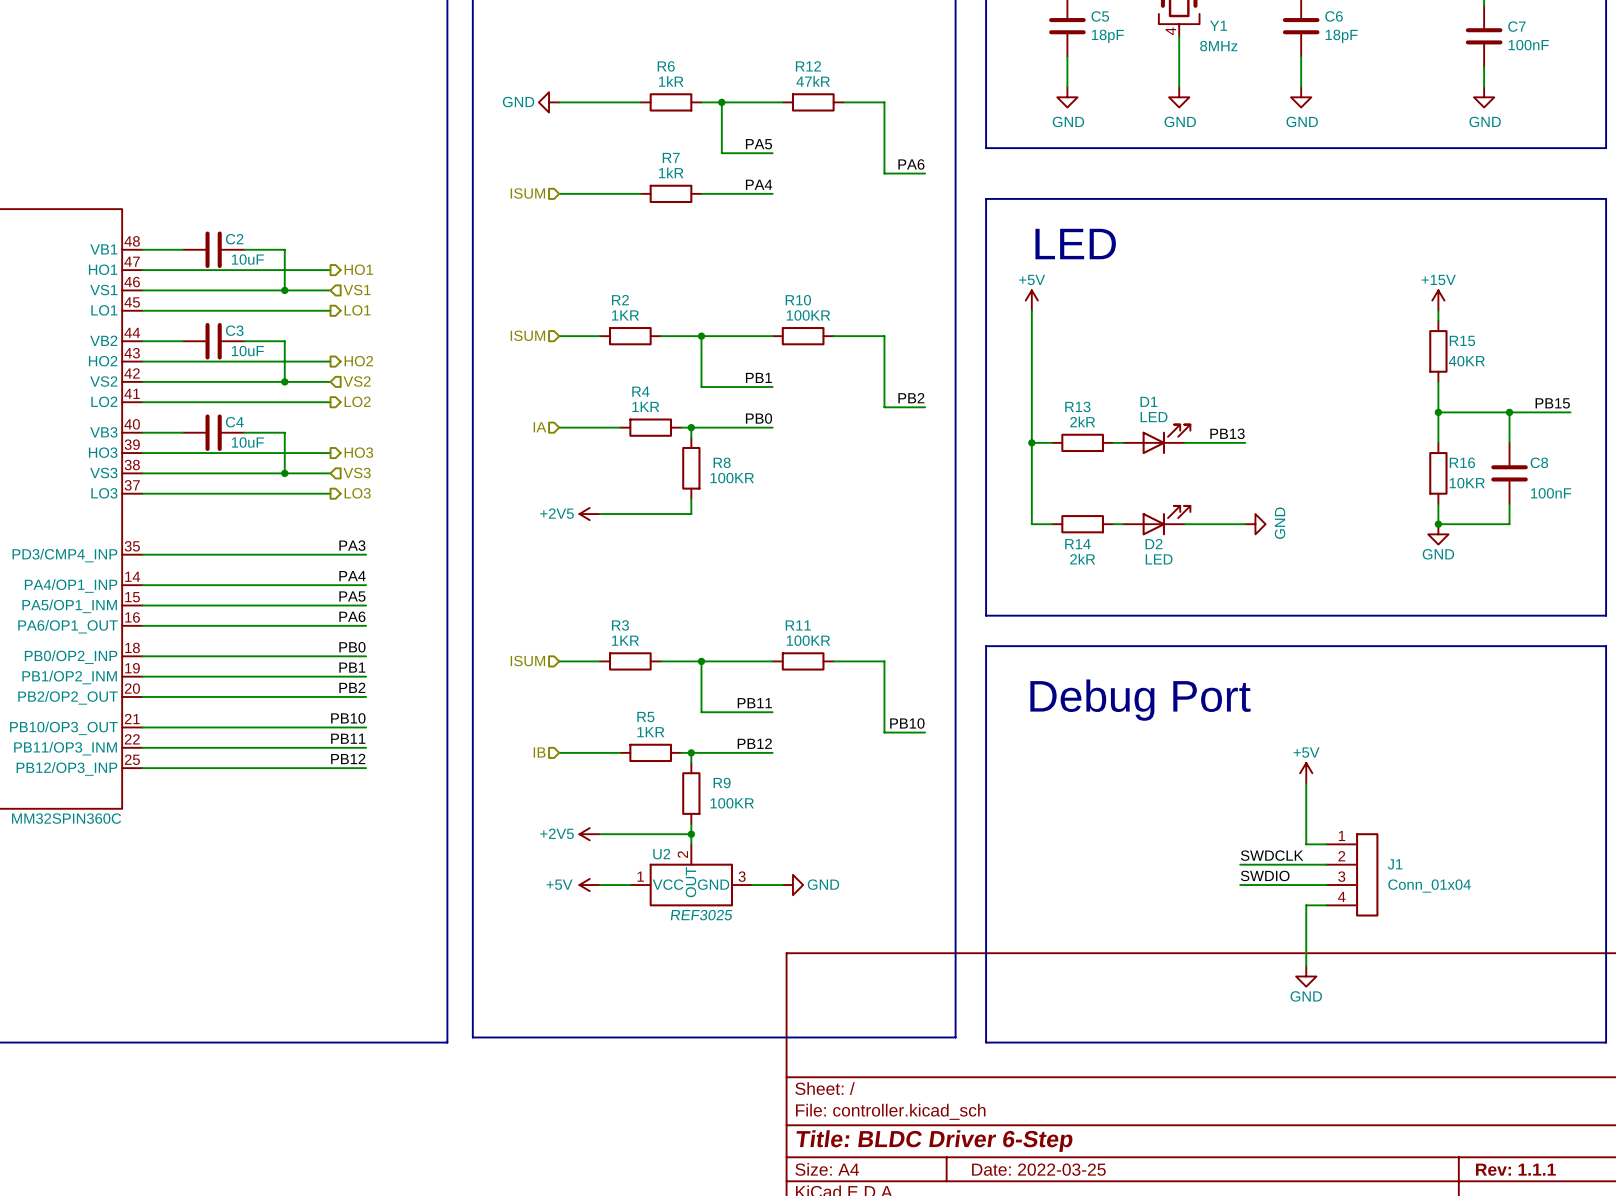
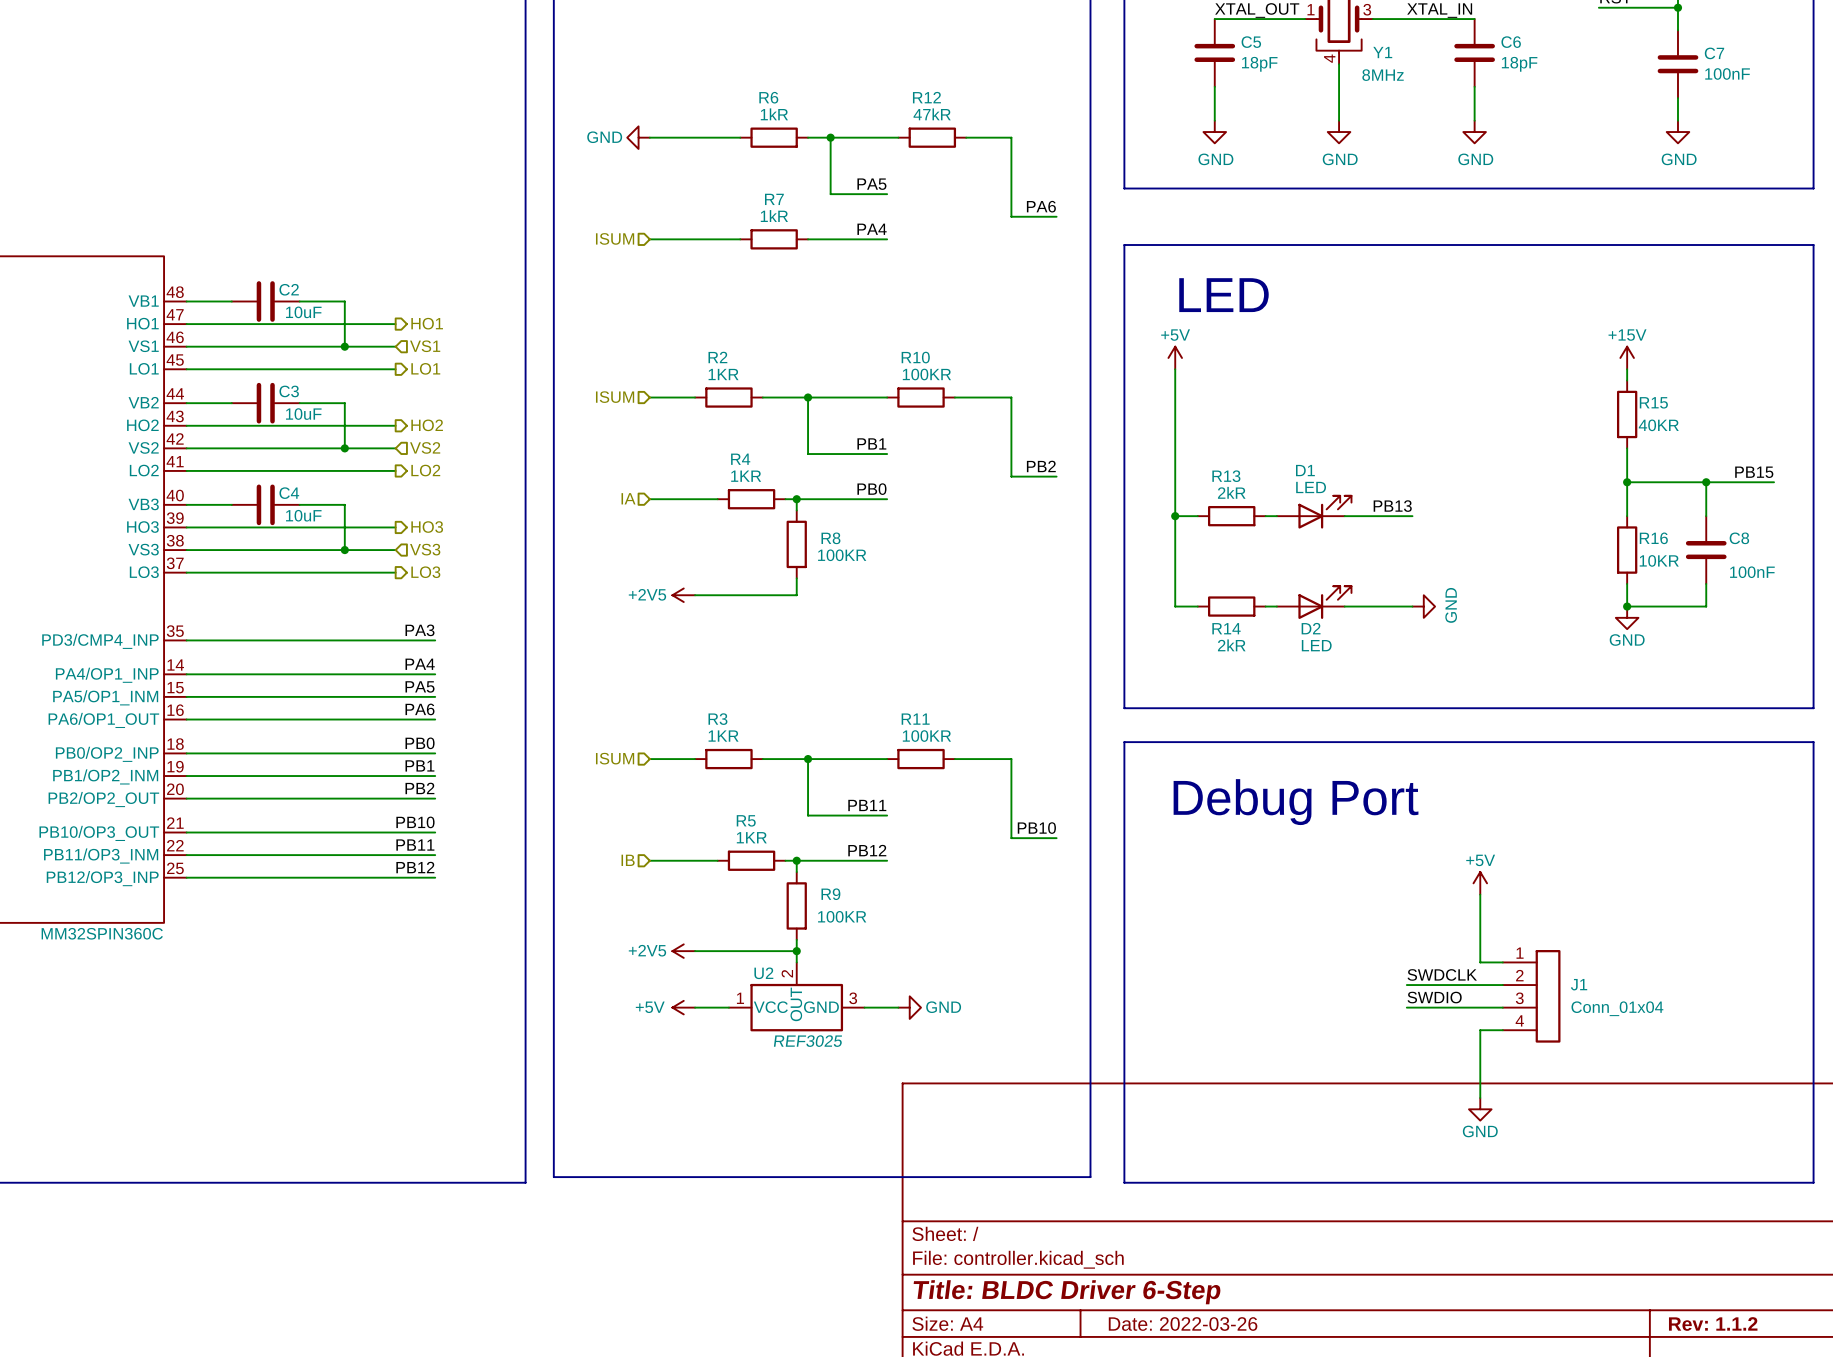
title block: Date: 2022-03-25 (1038, 1169) -> Date: 2022-03-26 (1183, 1324)
title block: Rev: 1.1.1 (1515, 1169) -> Rev: 1.1.2 (1713, 1324)

